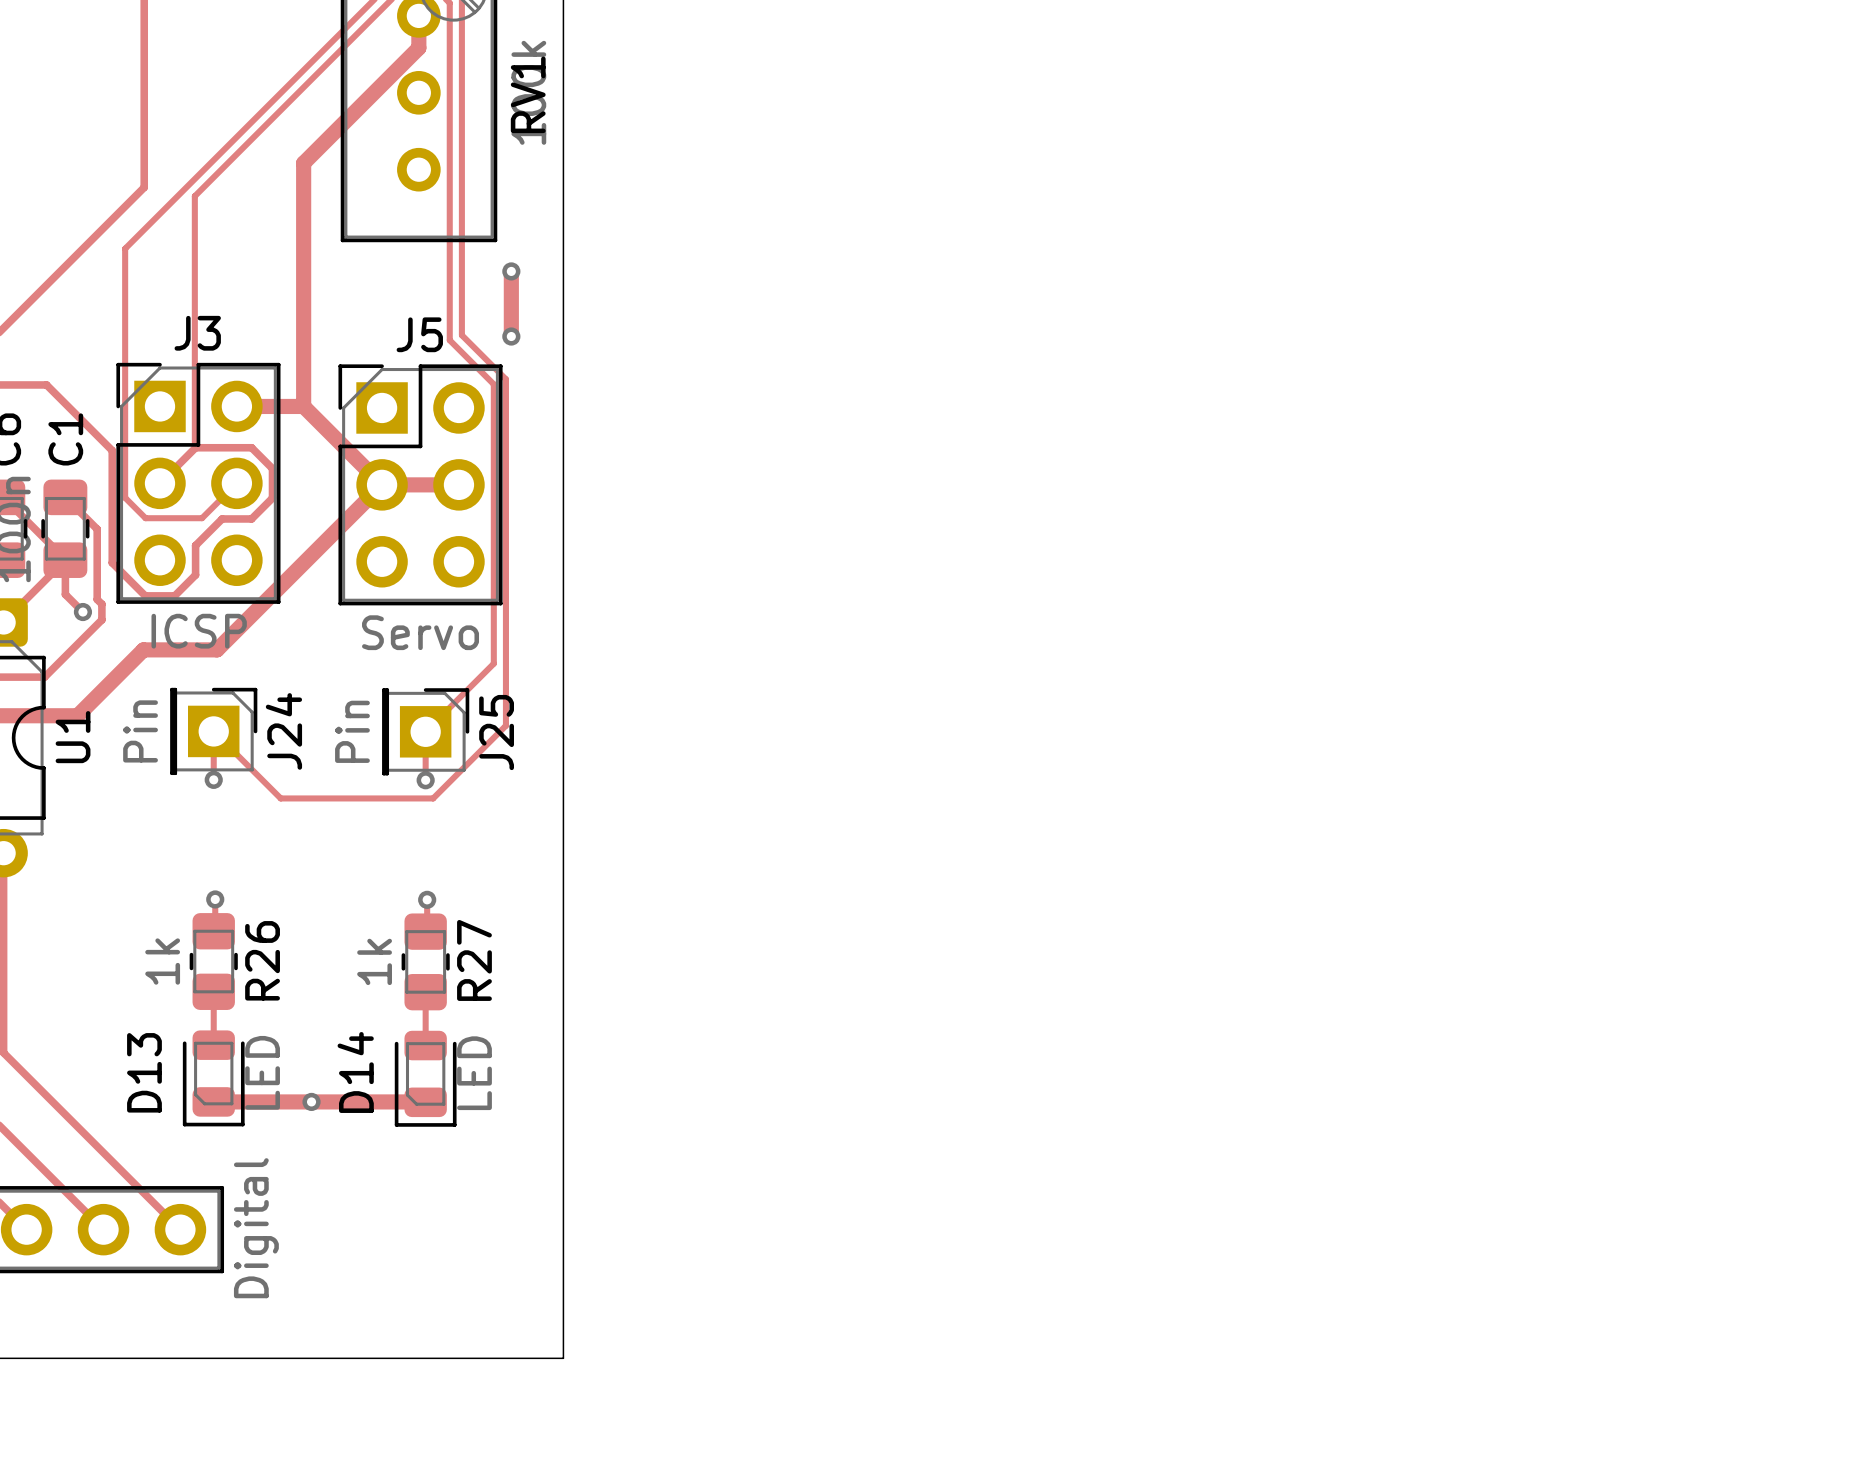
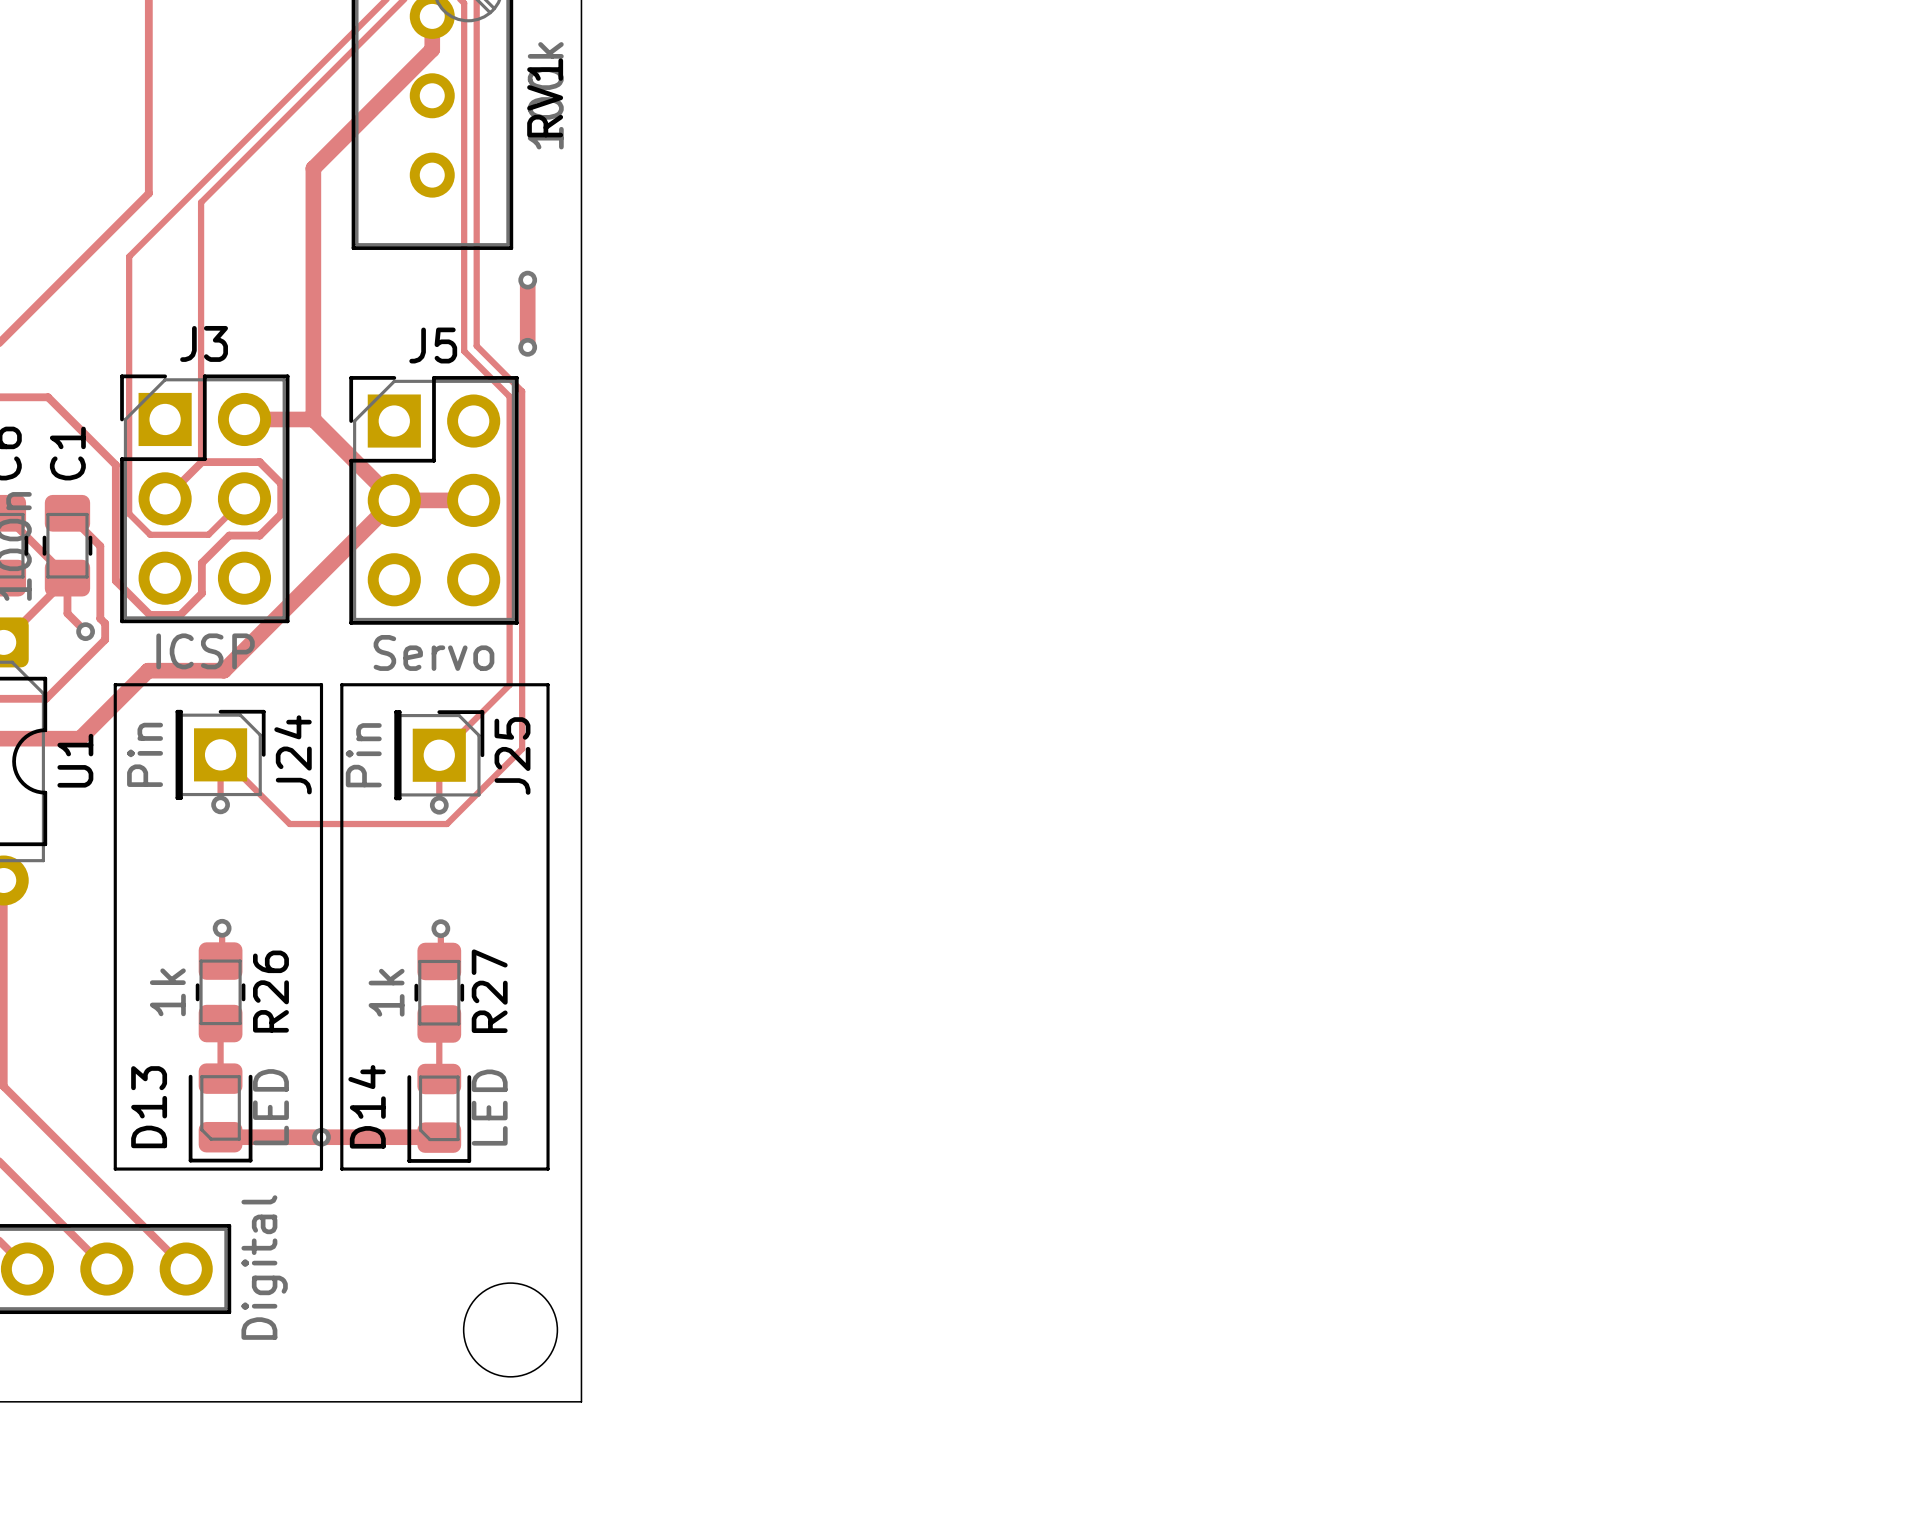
line: none -> (115, 684) (321, 684) (321, 1169) (115, 1169) (115, 684)
line: none -> (341, 684) (548, 684) (548, 1169) (341, 1169) (341, 684)
round board edge: none -> [462, 1282, 559, 1378]

